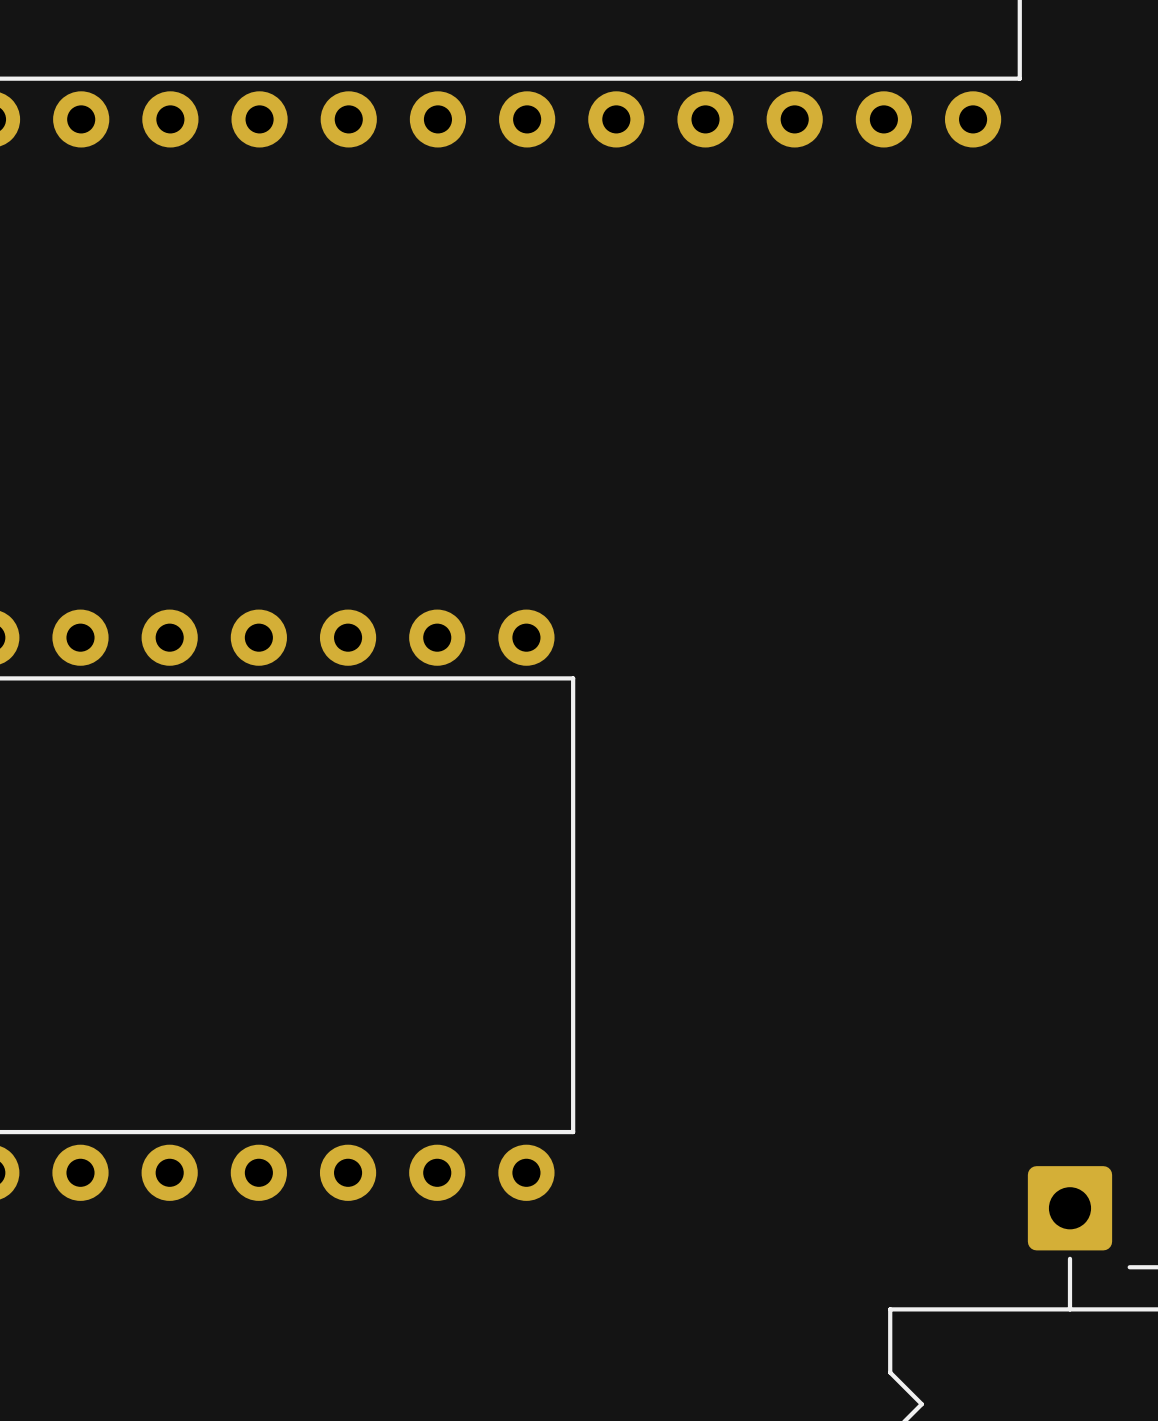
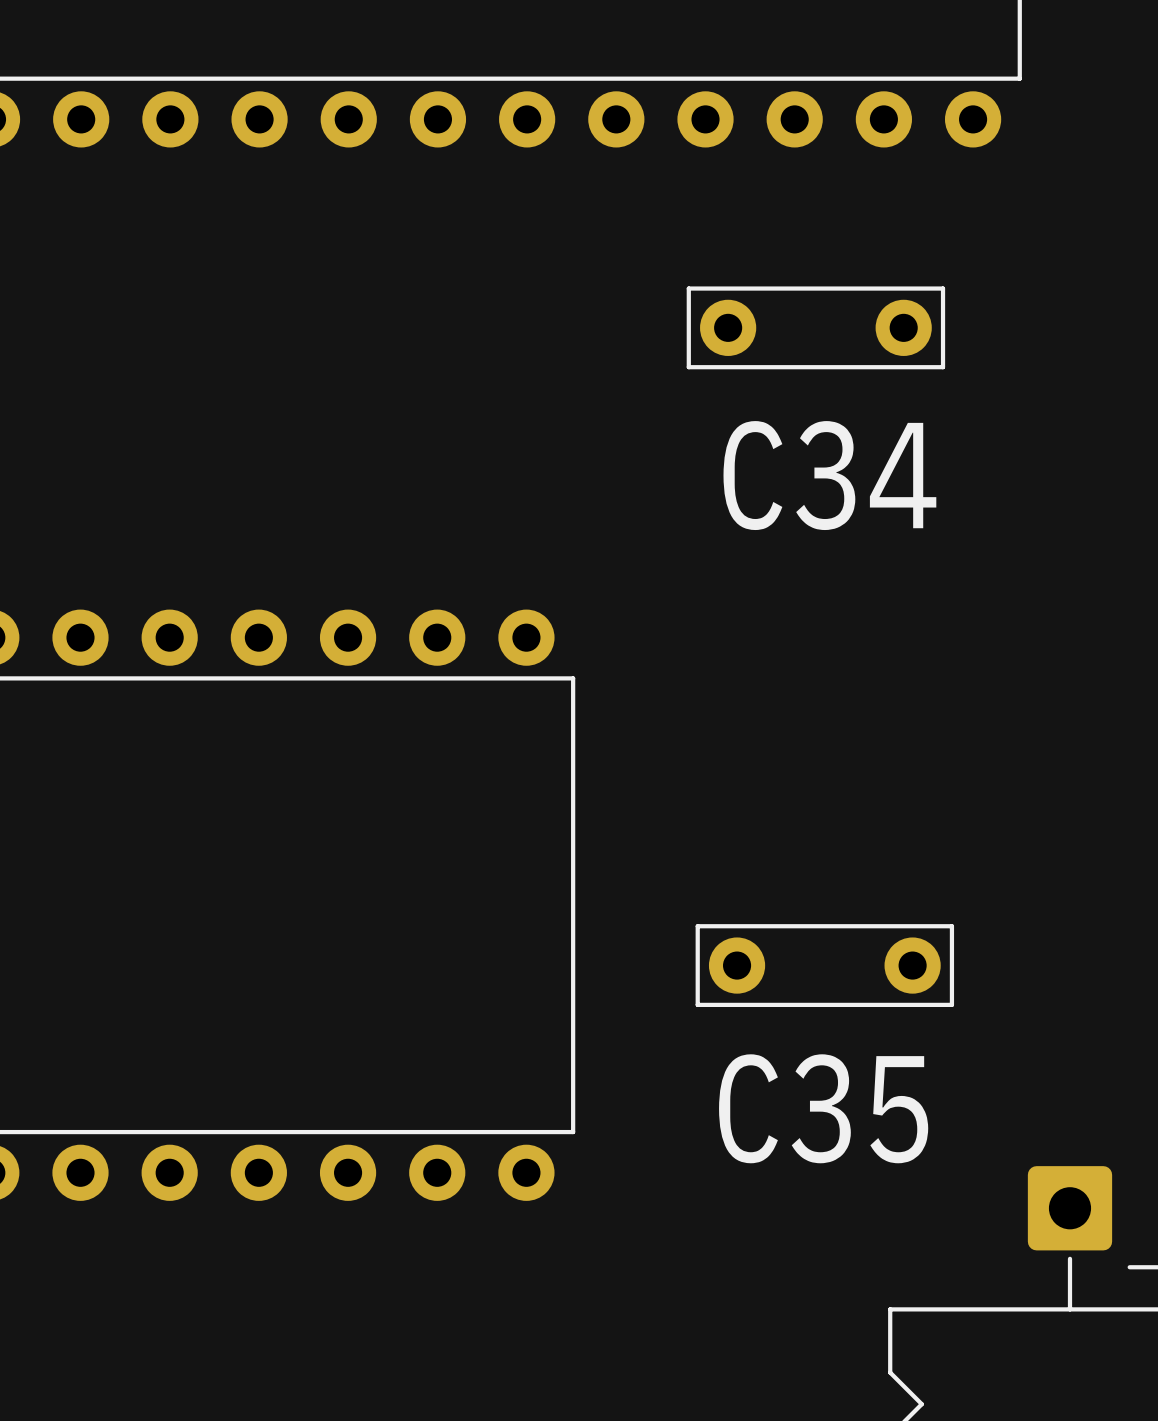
C34: none -> (815, 327)
C35: none -> (824, 965)

